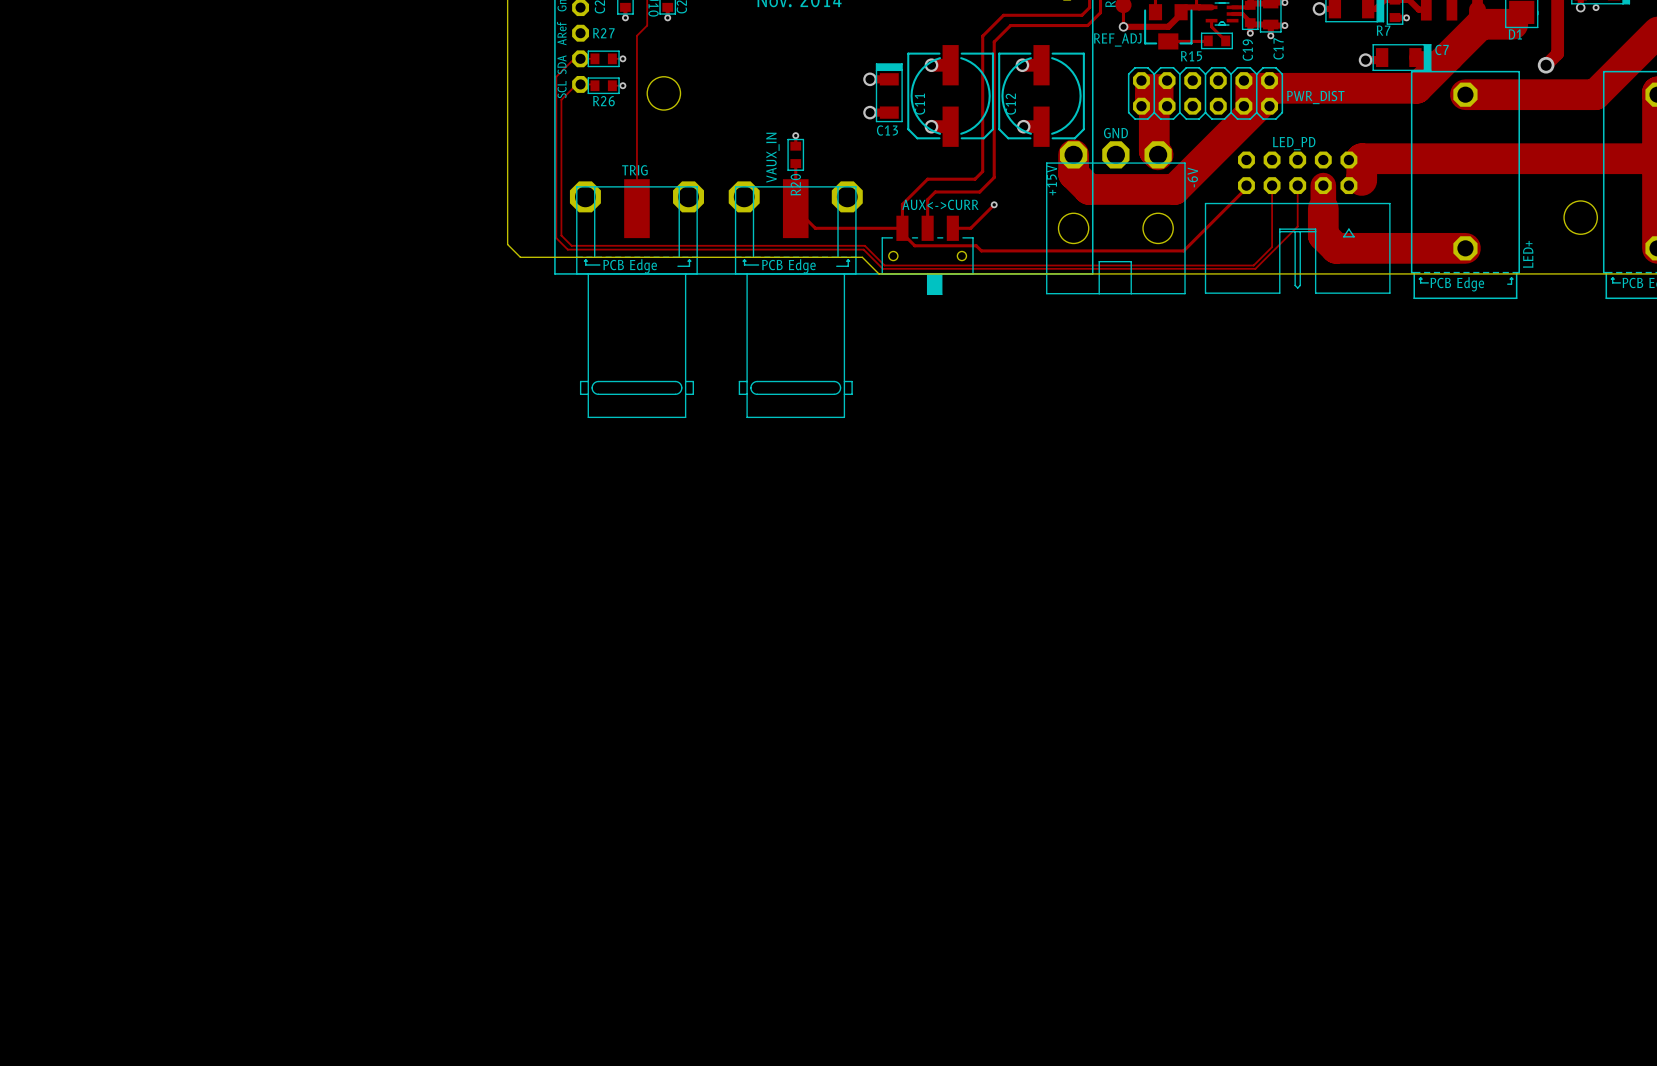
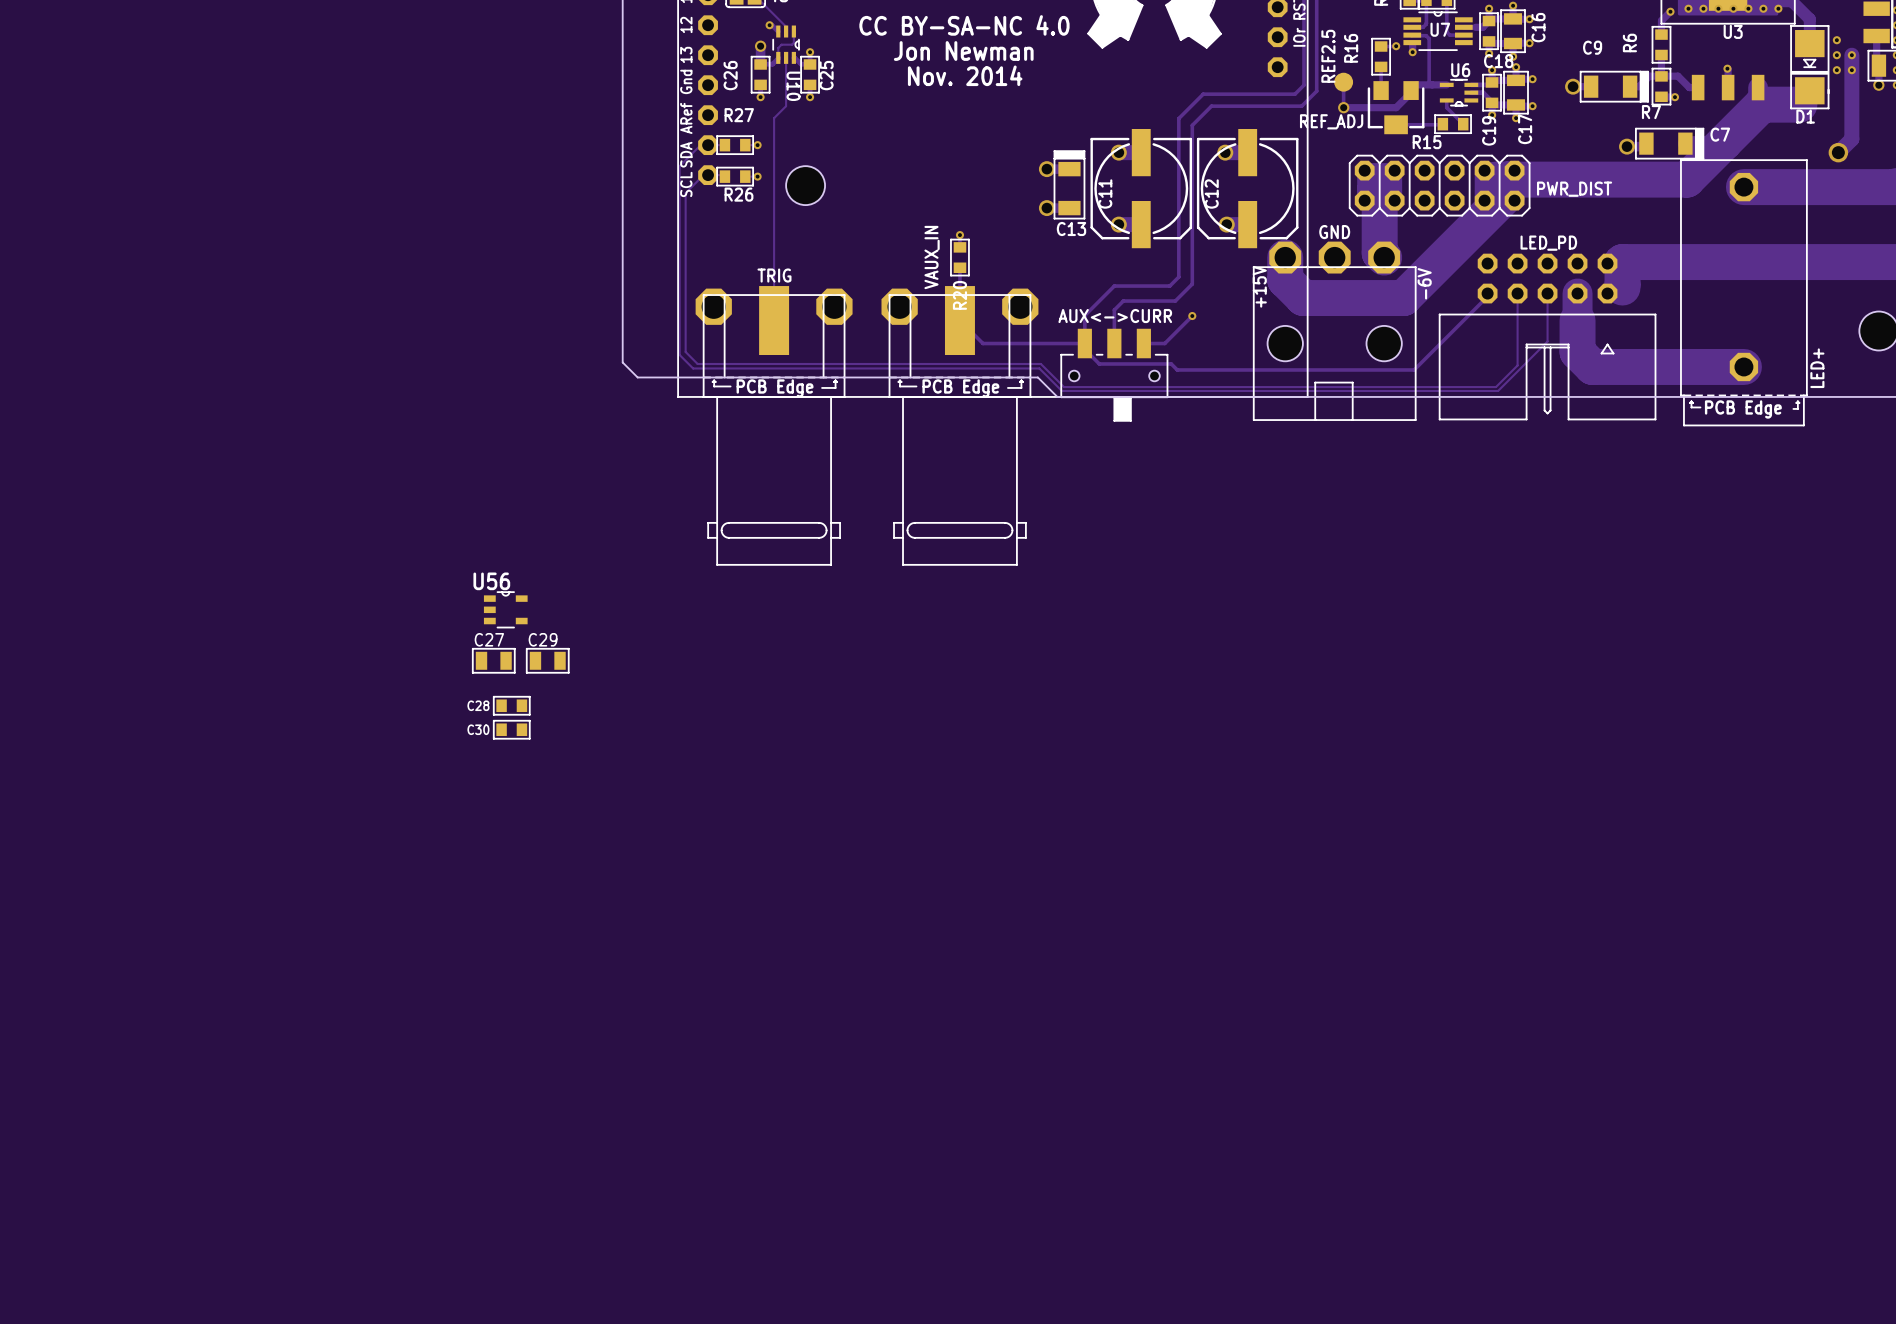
U56: none -> (505, 609)
C27: none -> (493, 660)
C29: none -> (547, 660)
C28: none -> (511, 705)
C30: none -> (511, 729)

